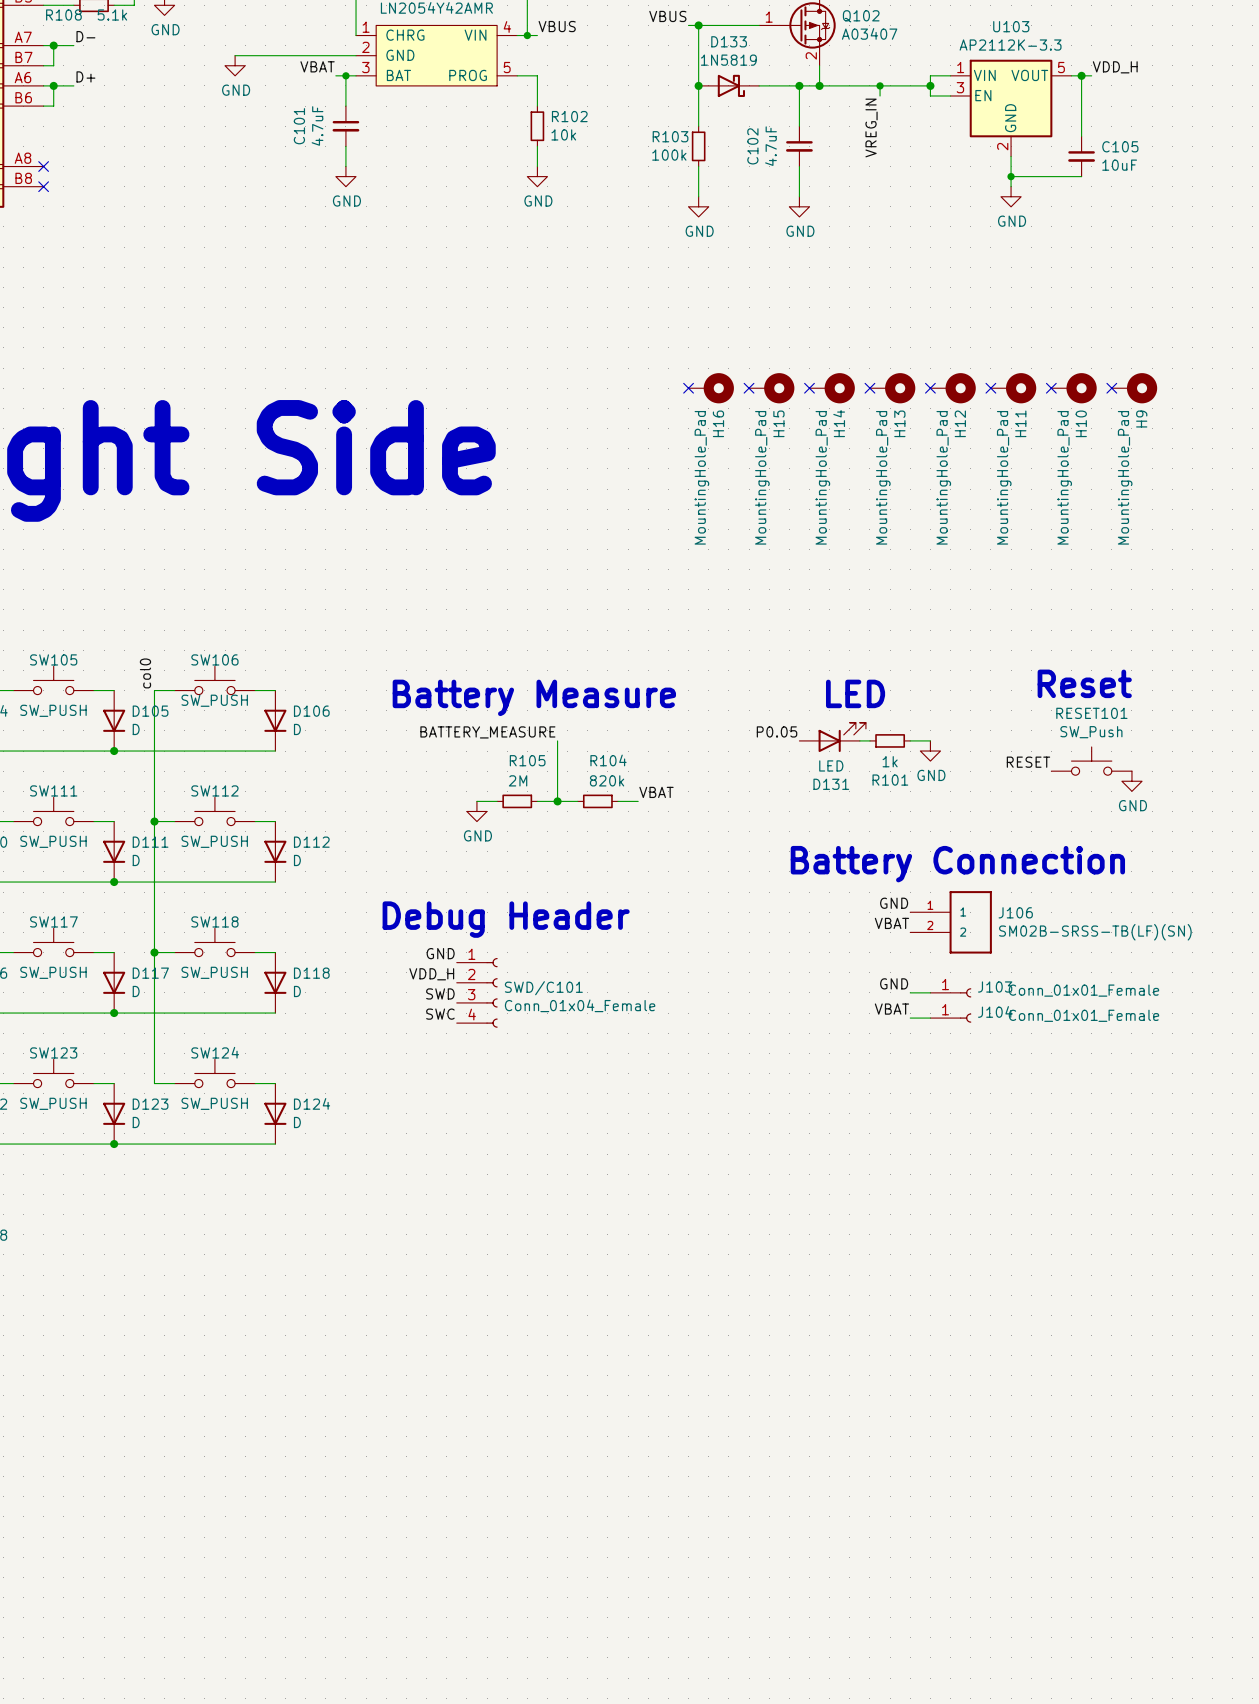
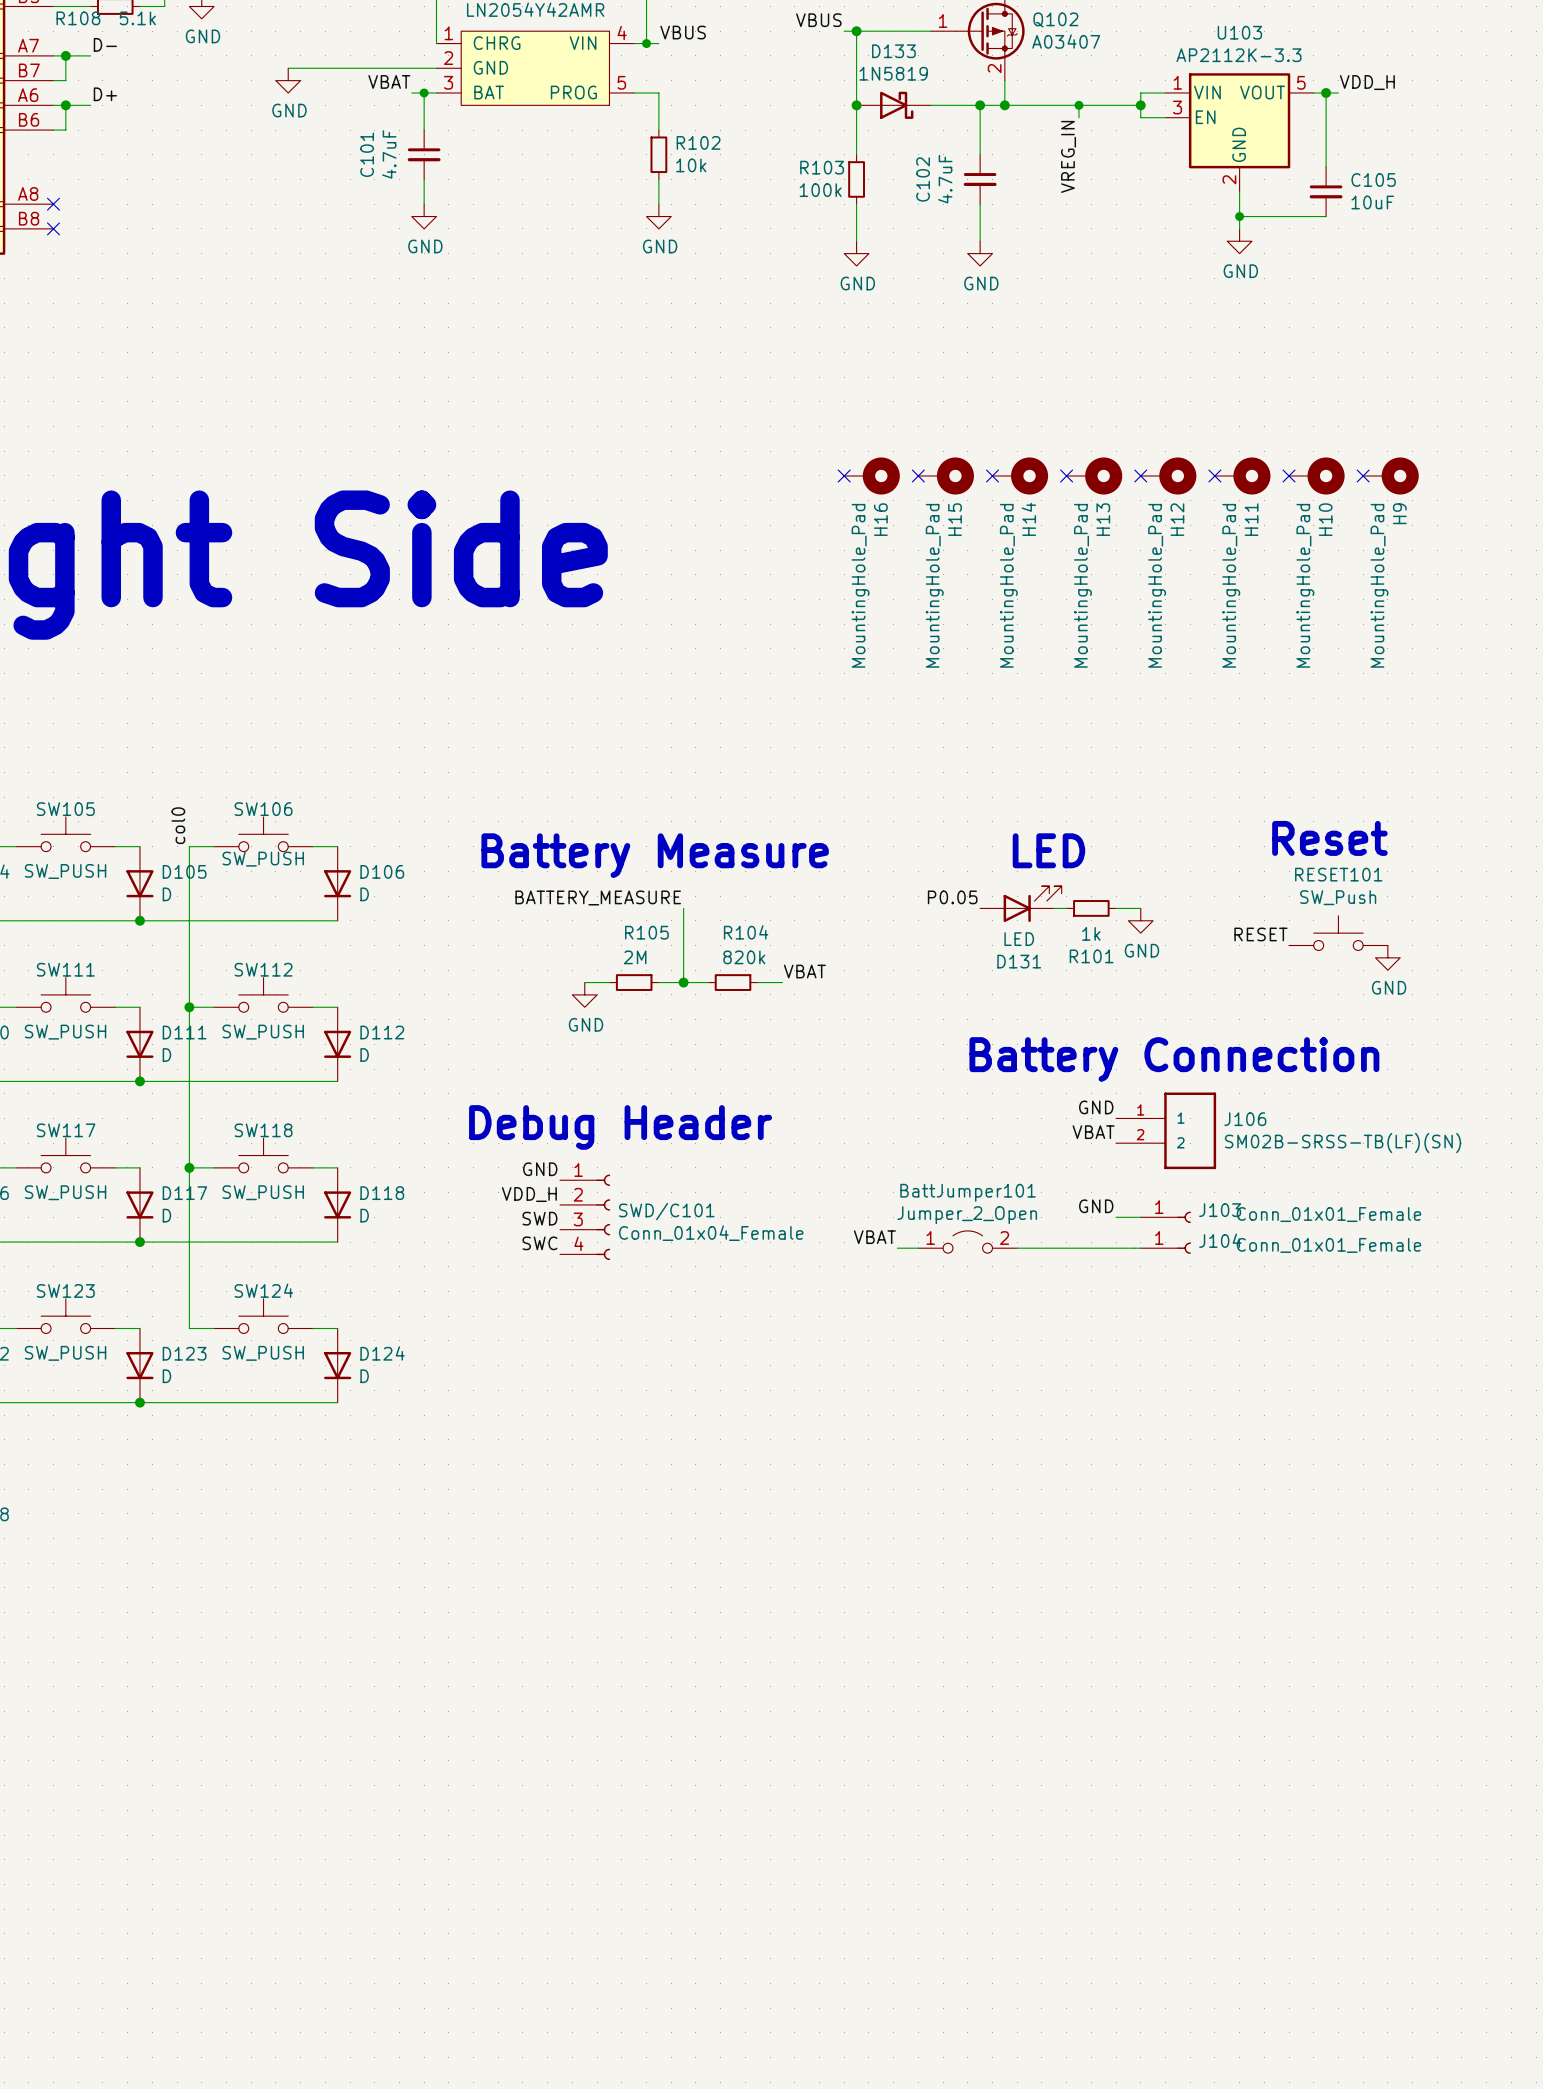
label position: VBAT (891, 1009) -> VBAT (874, 1237)
BattJumper101: none -> Jumper_2_Open (967, 1242)
wire: none -> (897, 1248) (918, 1248)
wire: none -> (1017, 1248) (1116, 1248)

